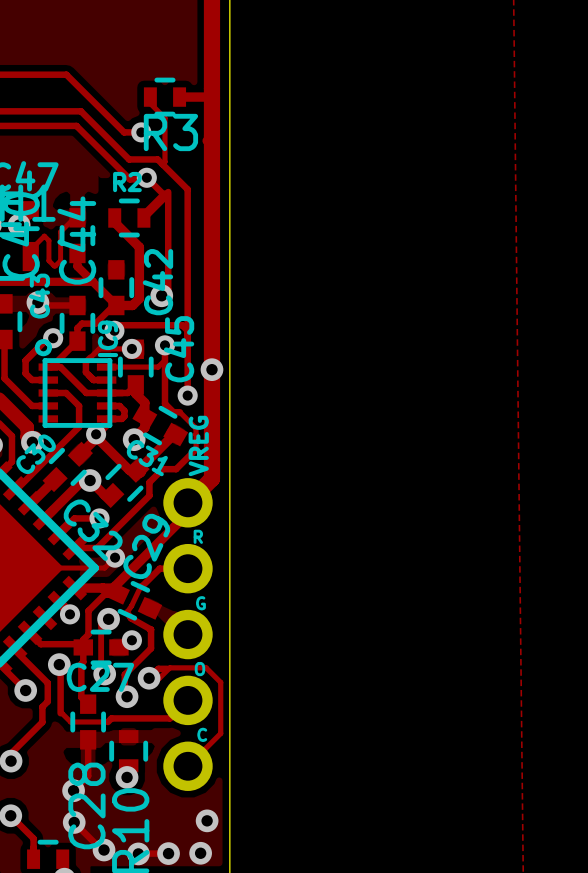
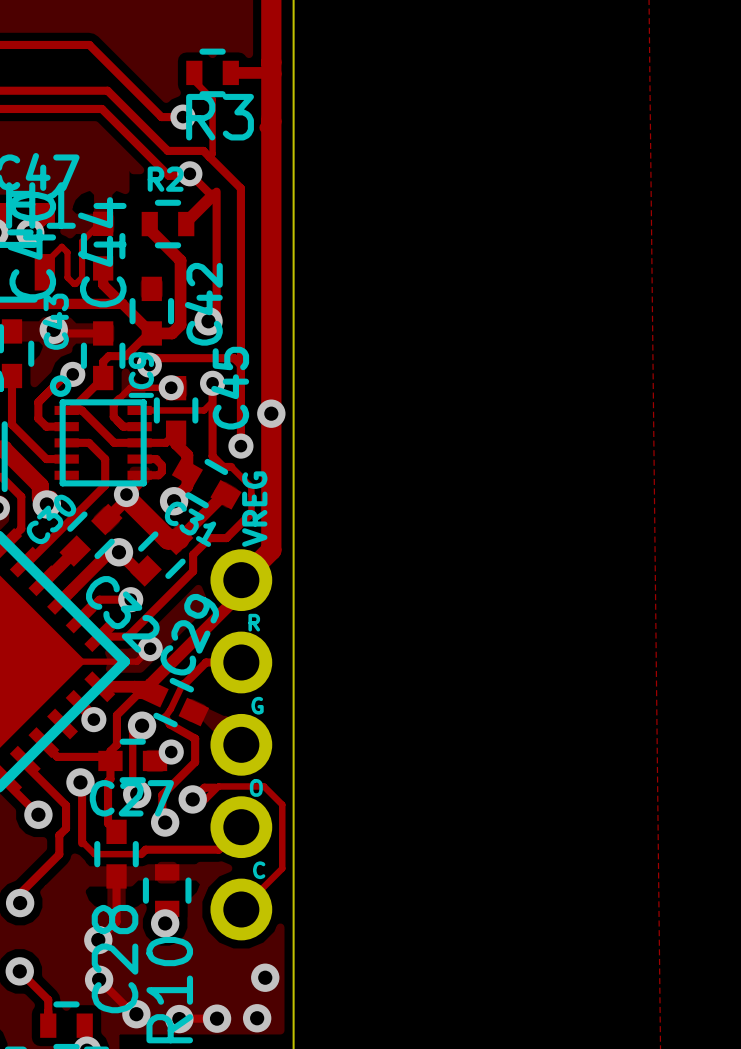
track width: thin (96, 436) (129, 470) (137, 470) -> thick (126, 497) (168, 539) (177, 539)

